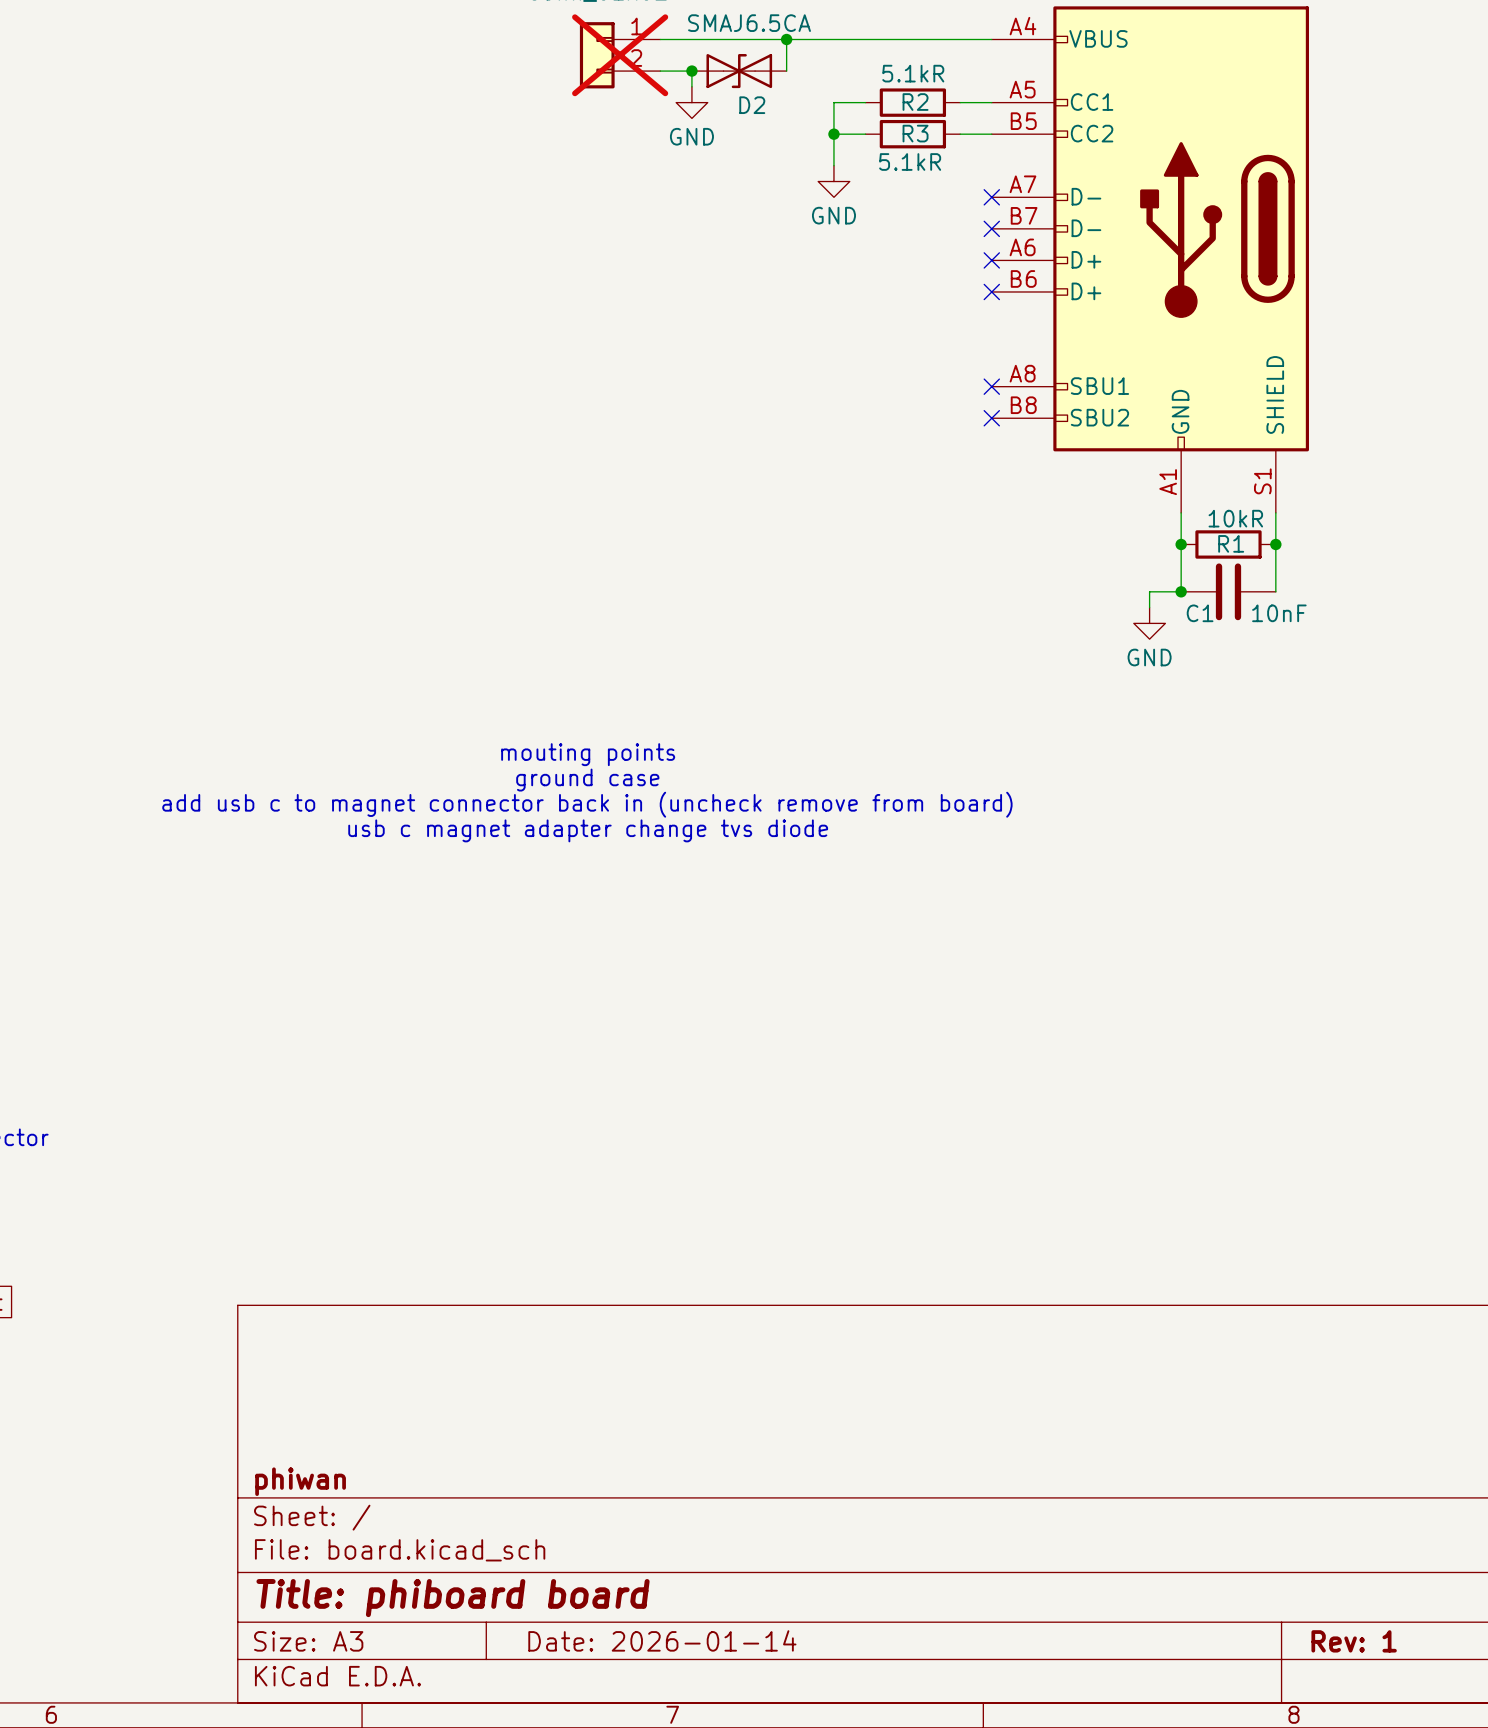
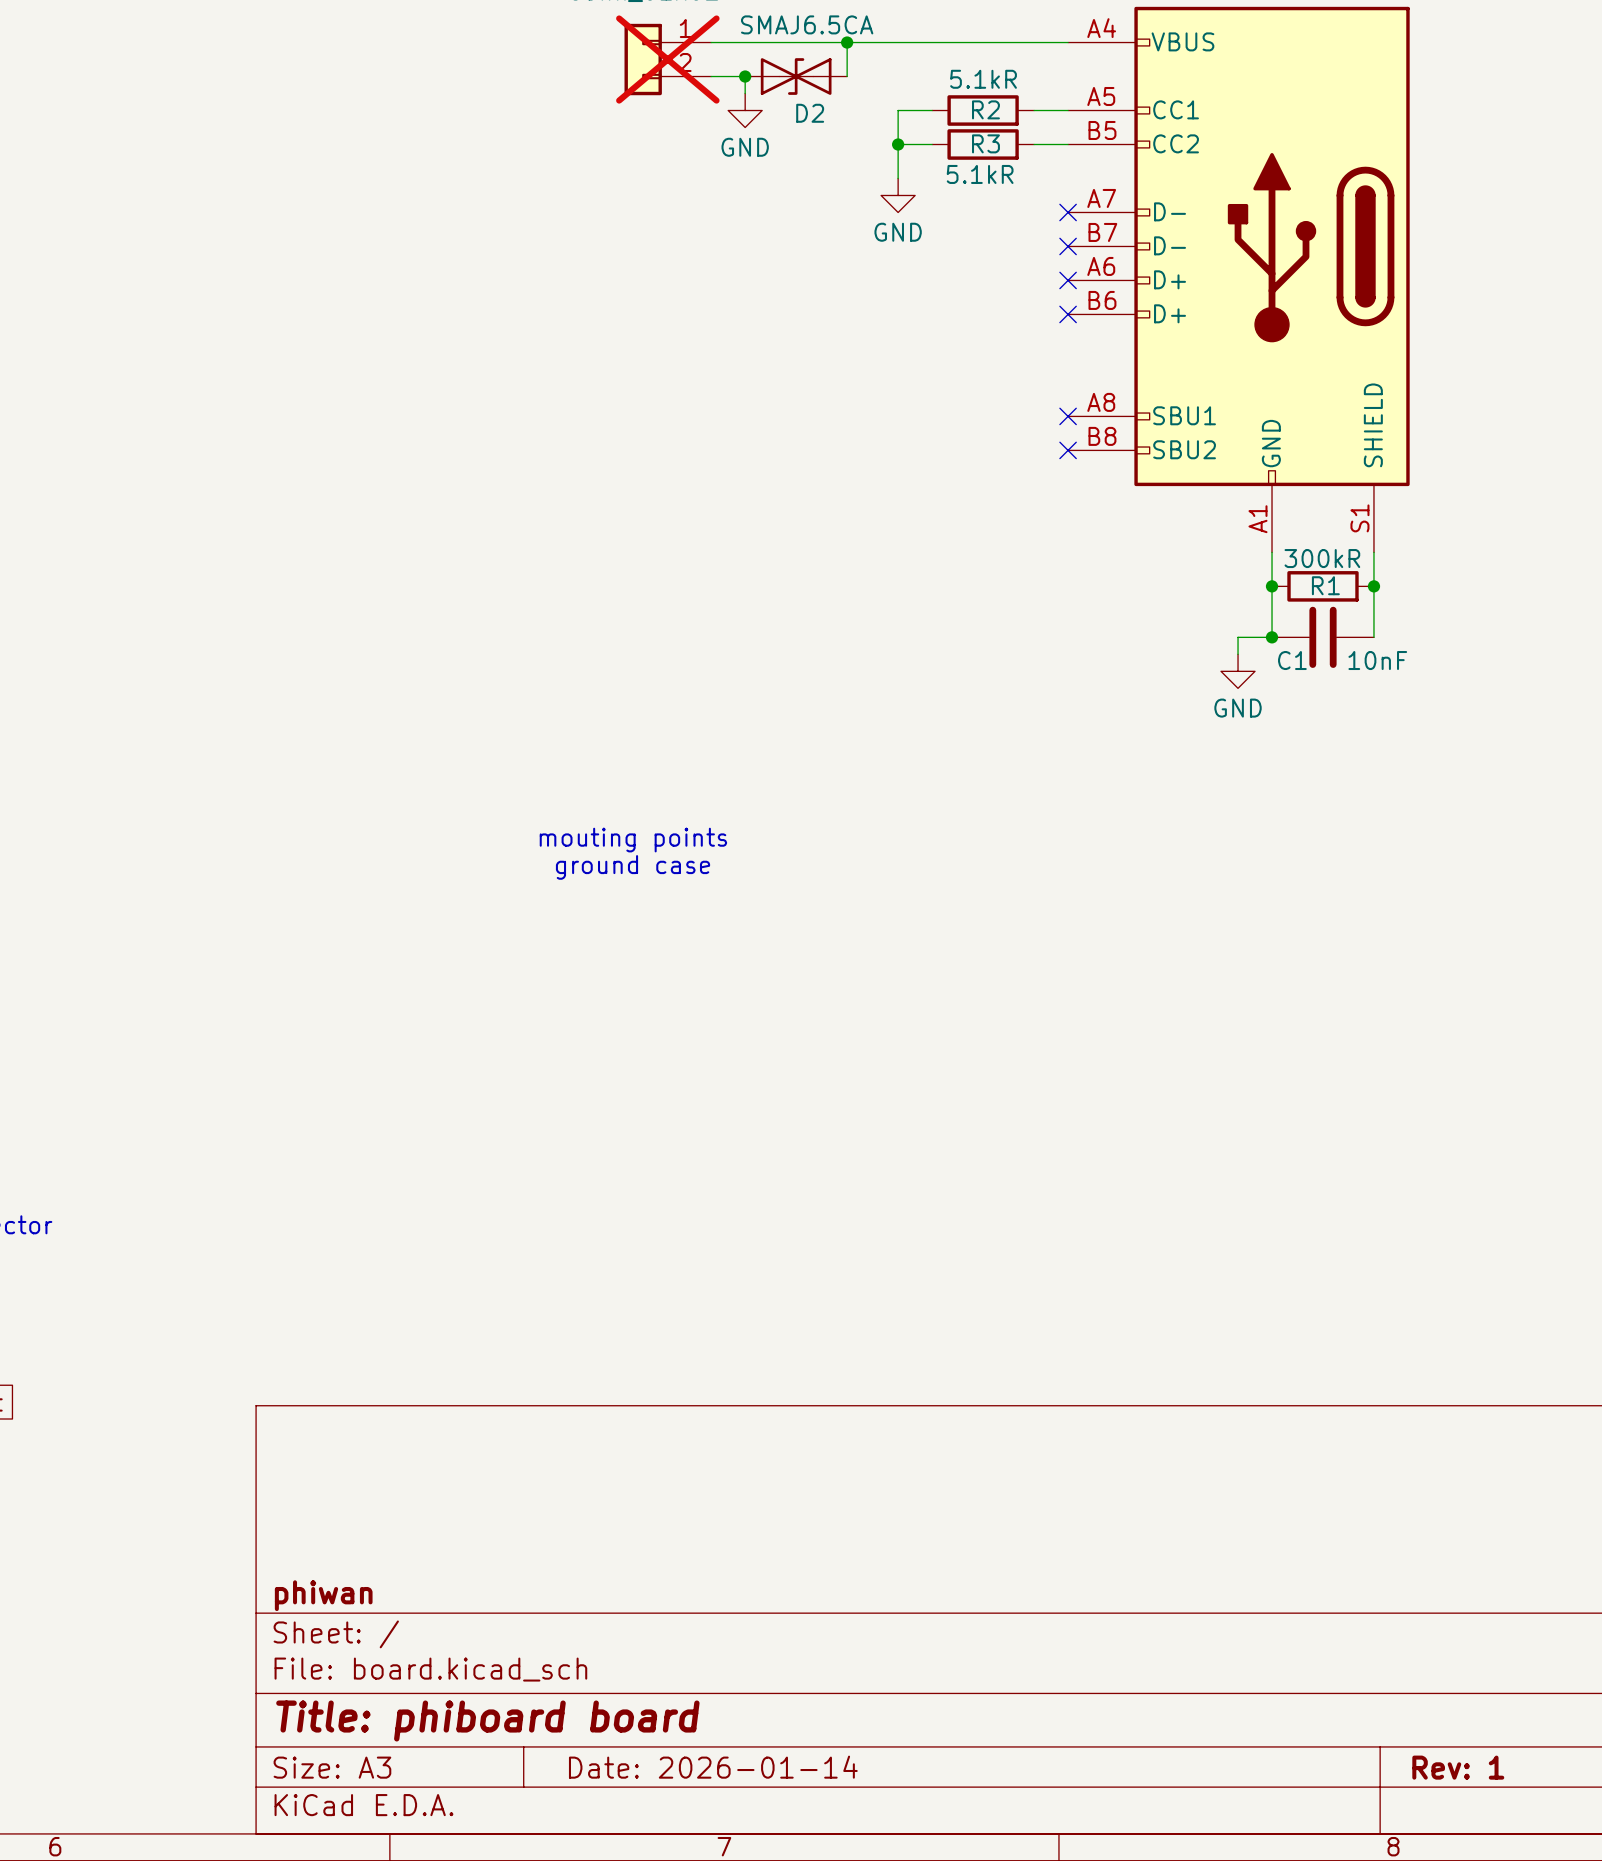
R1 value: 10kR (1235, 518) -> 300kR (1322, 558)
text: mouting points (588, 754) -> none
text: ground case (587, 780) -> mouting points (633, 840)
text: add usb c to magnet connector back in (uncheck remove from board) (587, 804) -> ground case (633, 867)
text: usb c magnet adapter change tvs diode (588, 830) -> none

